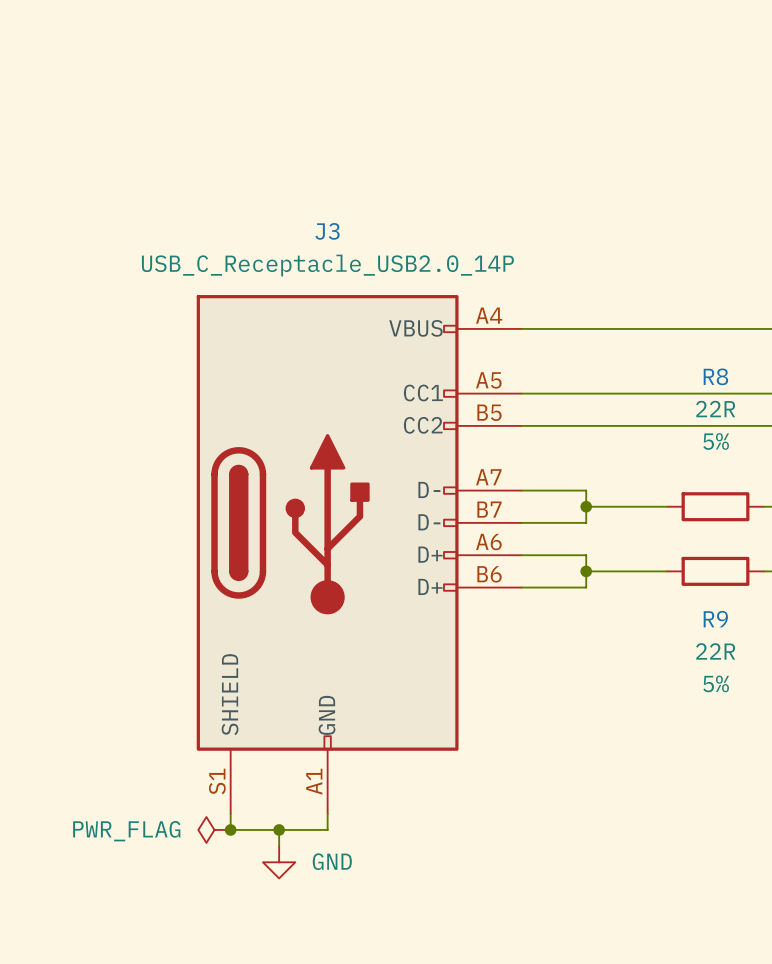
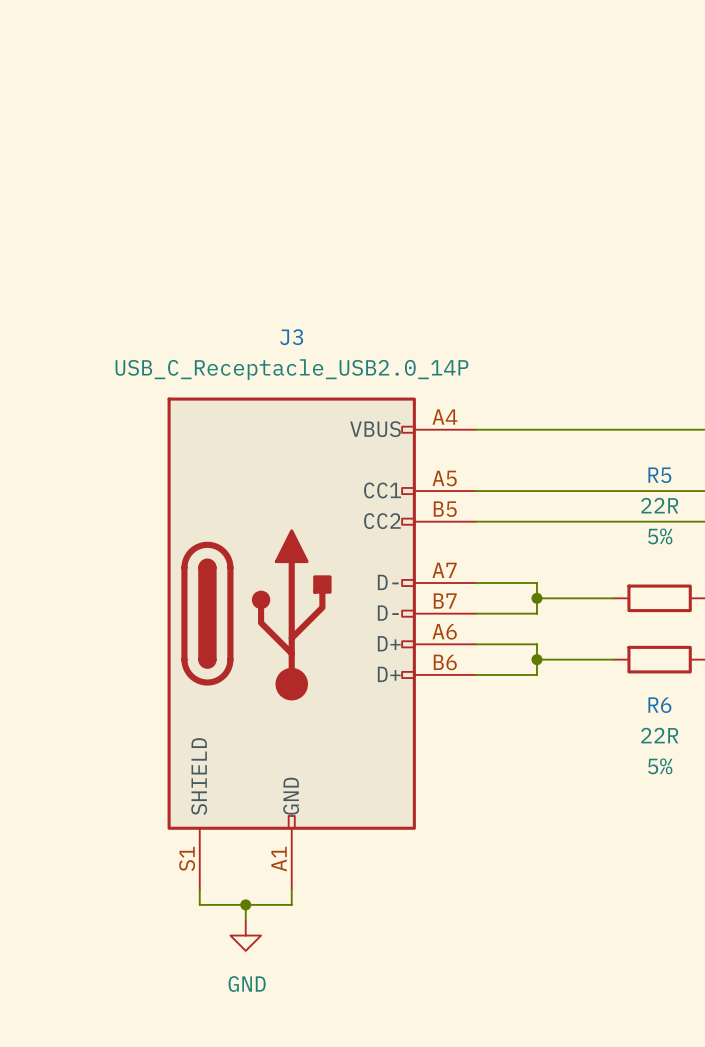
R8 name: R8 (715, 376) -> R5 (659, 475)
R9 name: R9 (715, 619) -> R6 (659, 705)
power symbol: PWR_FLAG (214, 829) -> none
junction: (230, 829) -> none
power symbol text position: GND (332, 861) -> GND (247, 984)

